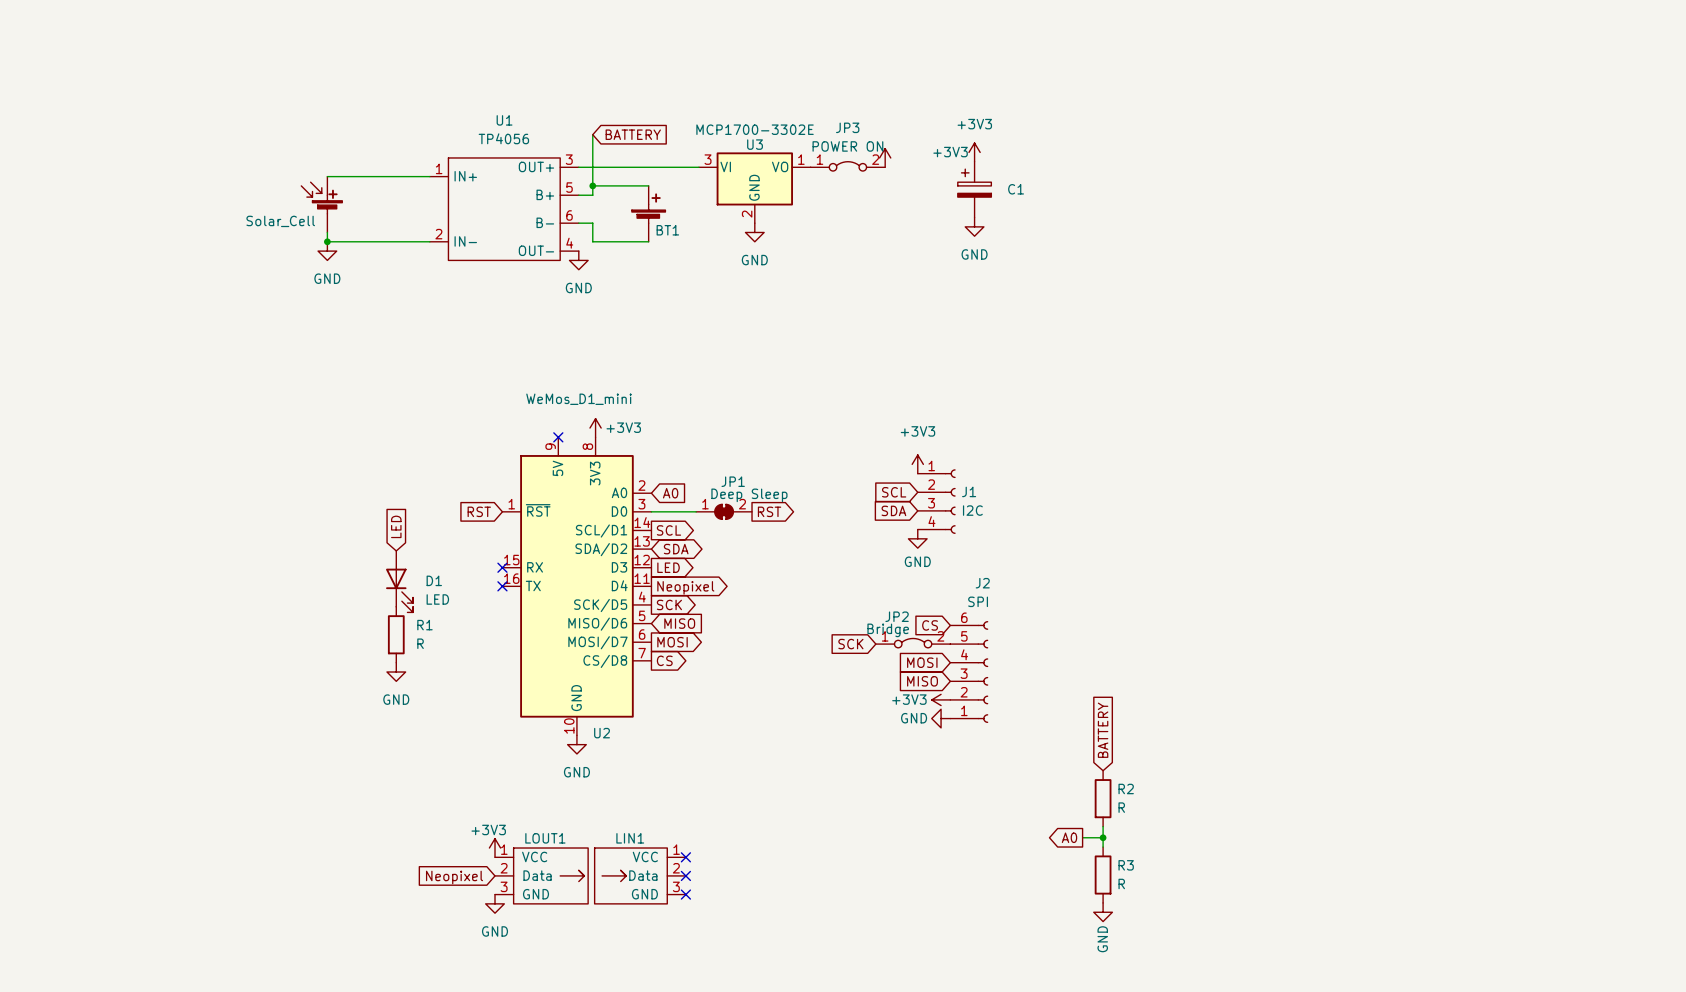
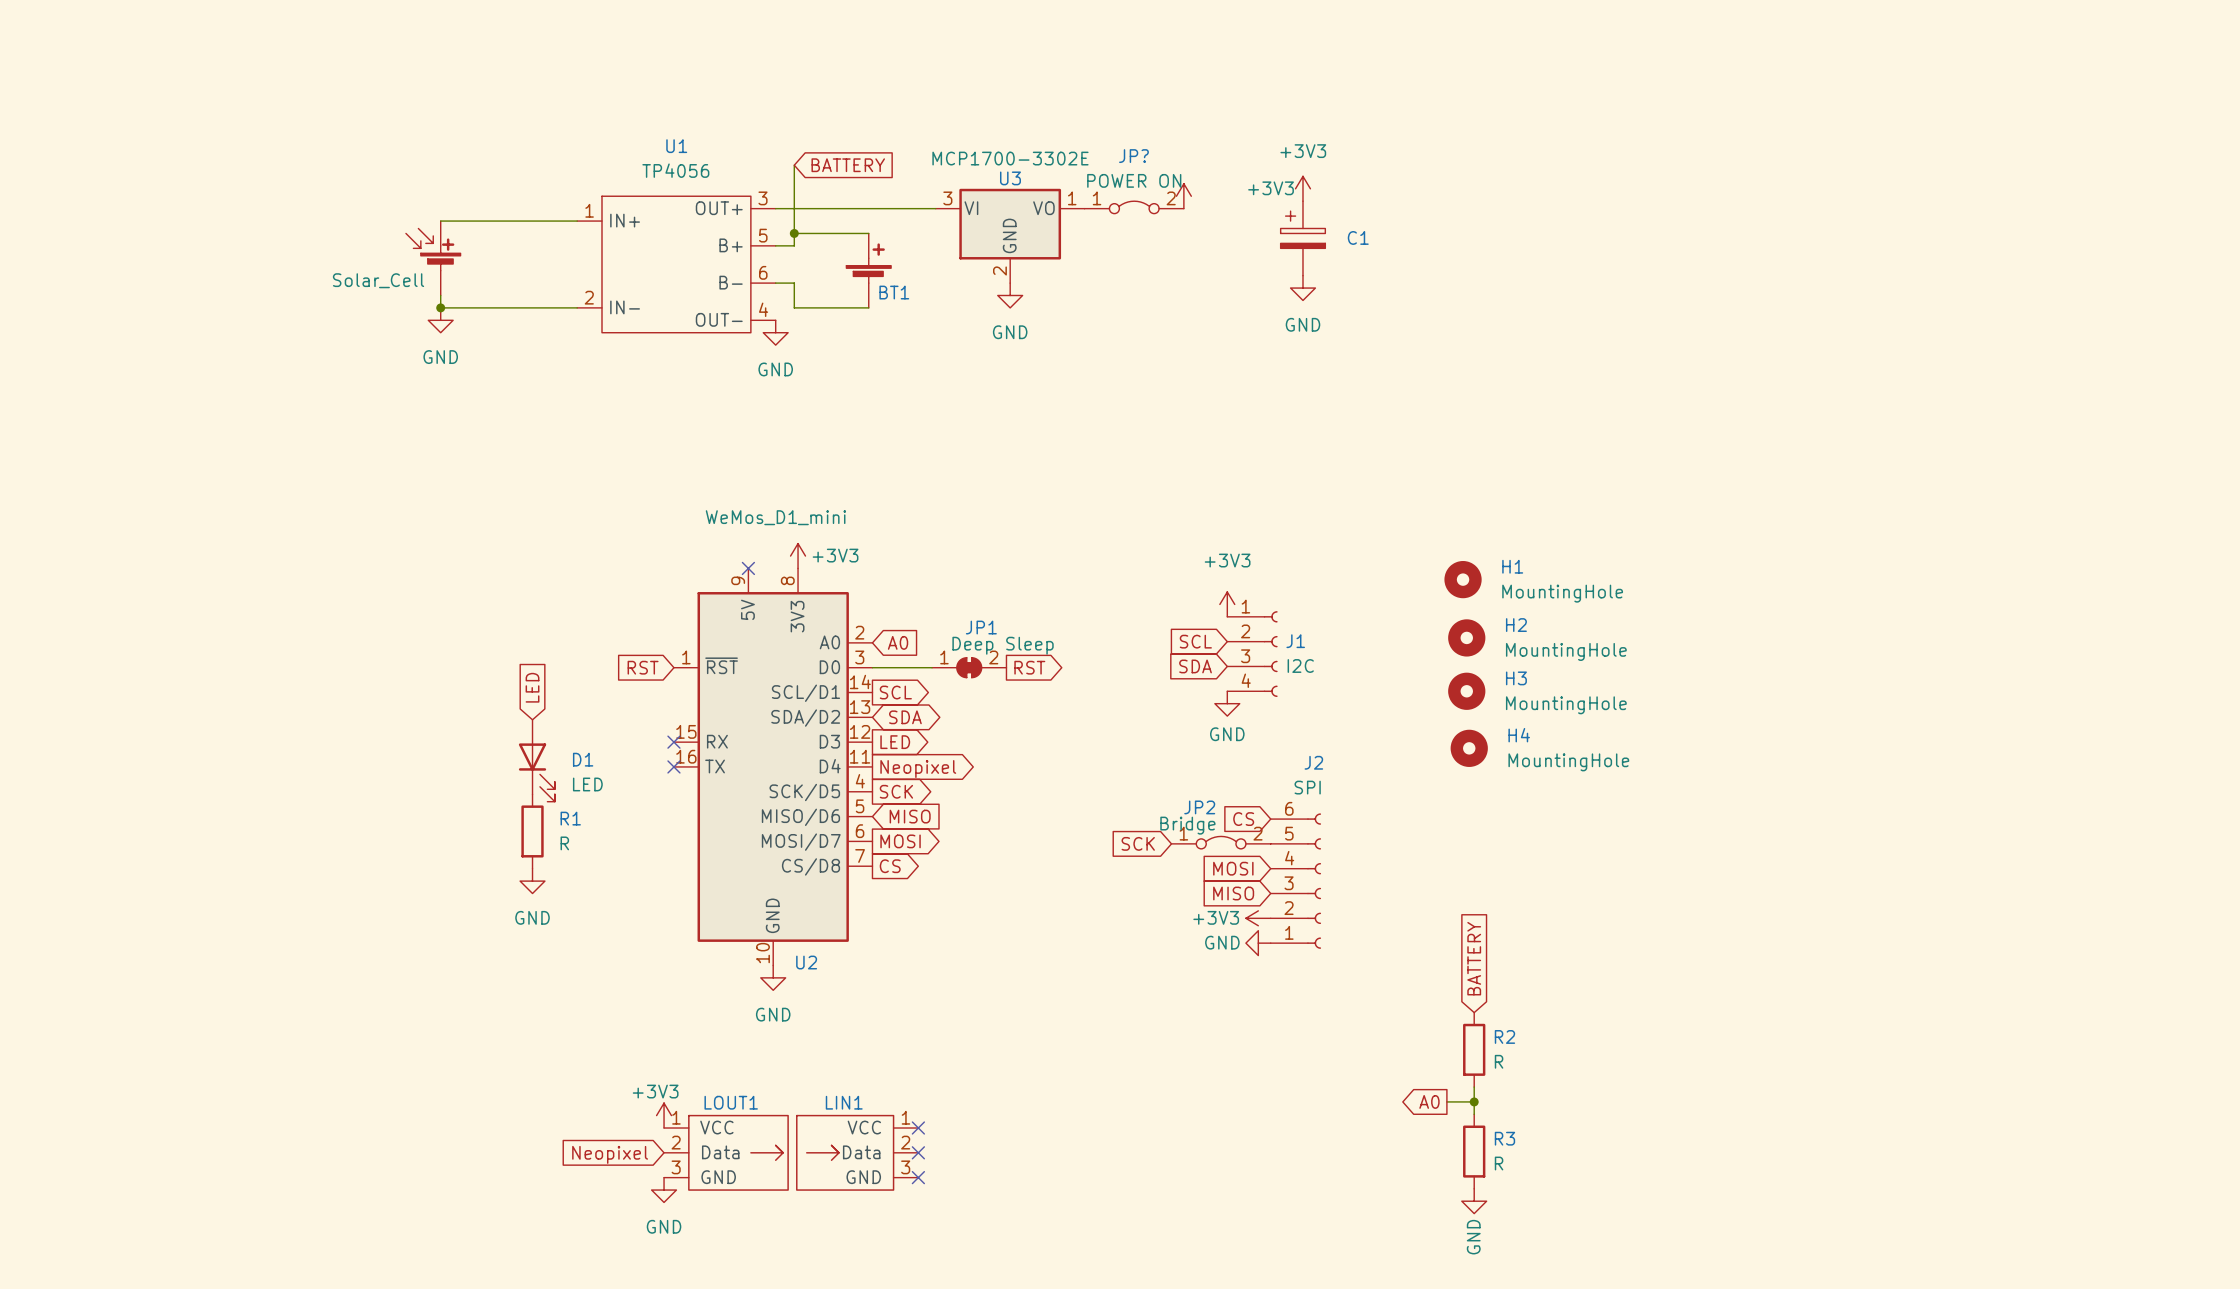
JP3 name: JP3 (847, 127) -> JP? (1133, 156)
H1: none -> MountingHole (1463, 579)
H2: none -> MountingHole (1466, 637)
H3: none -> MountingHole (1466, 691)
H4: none -> MountingHole (1469, 748)

